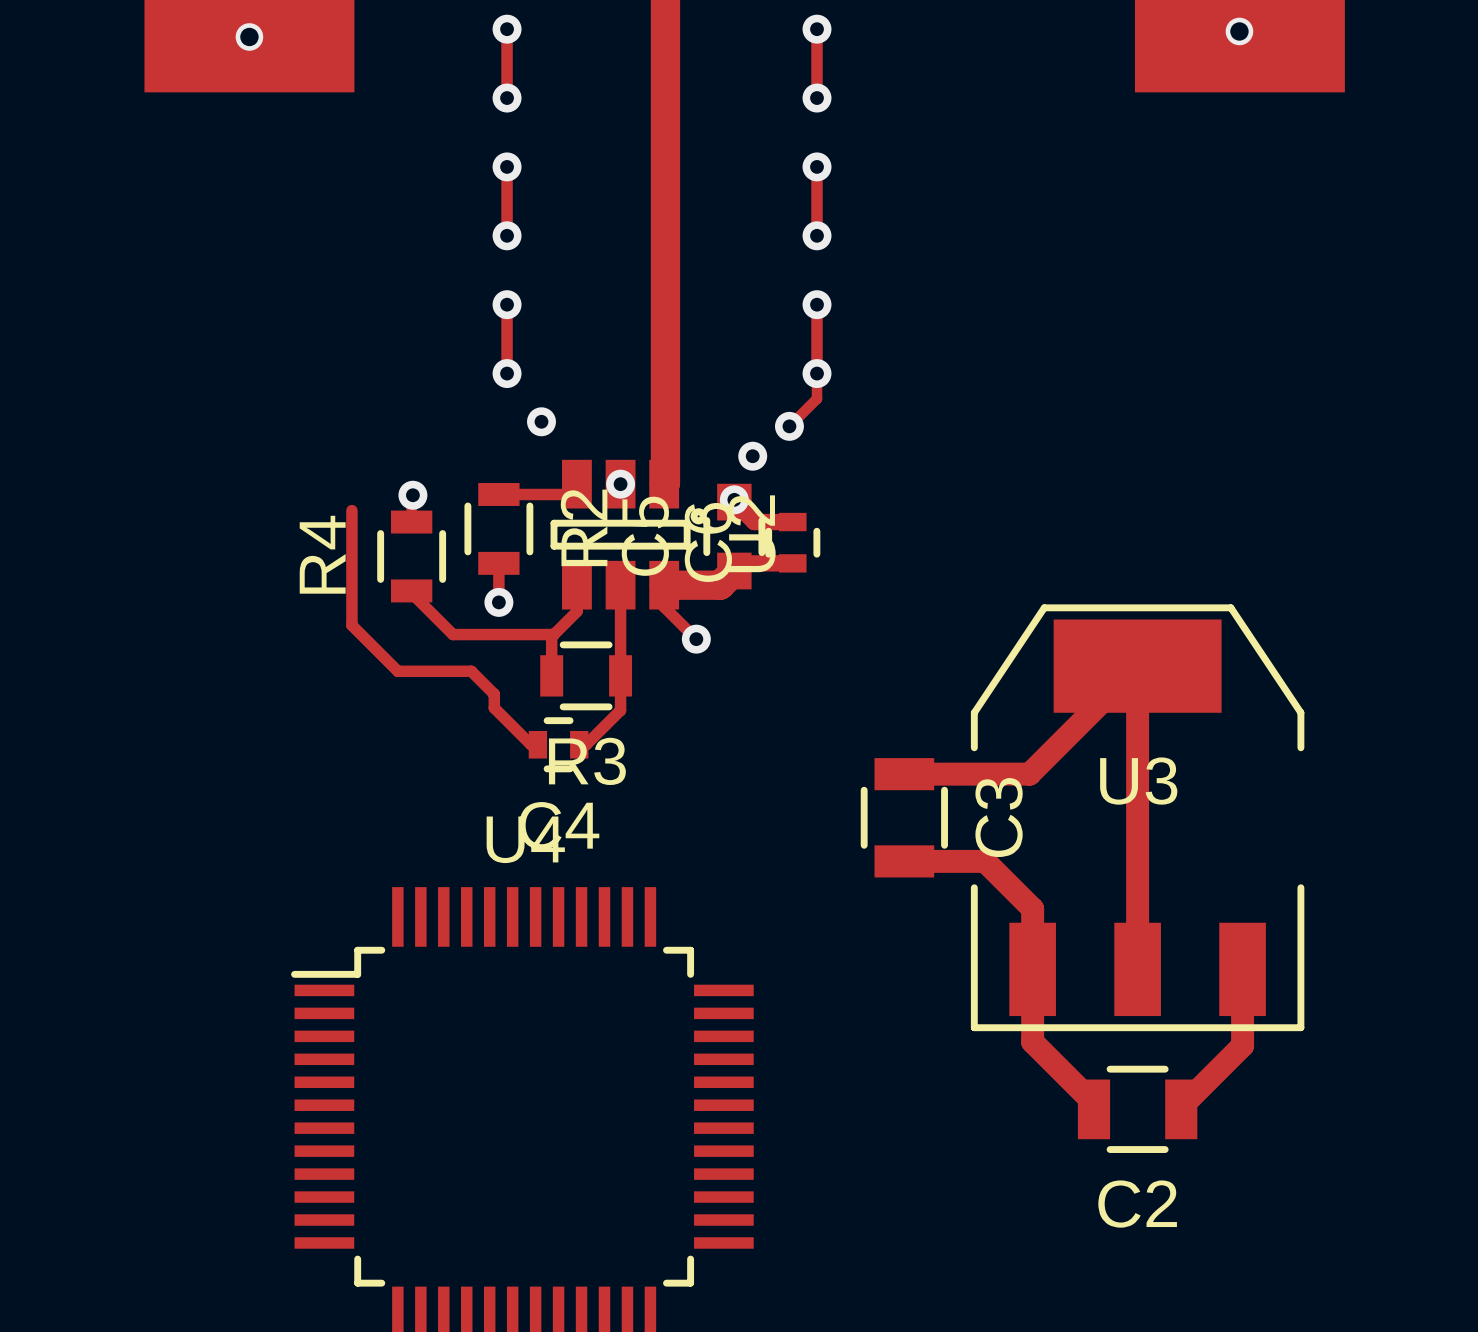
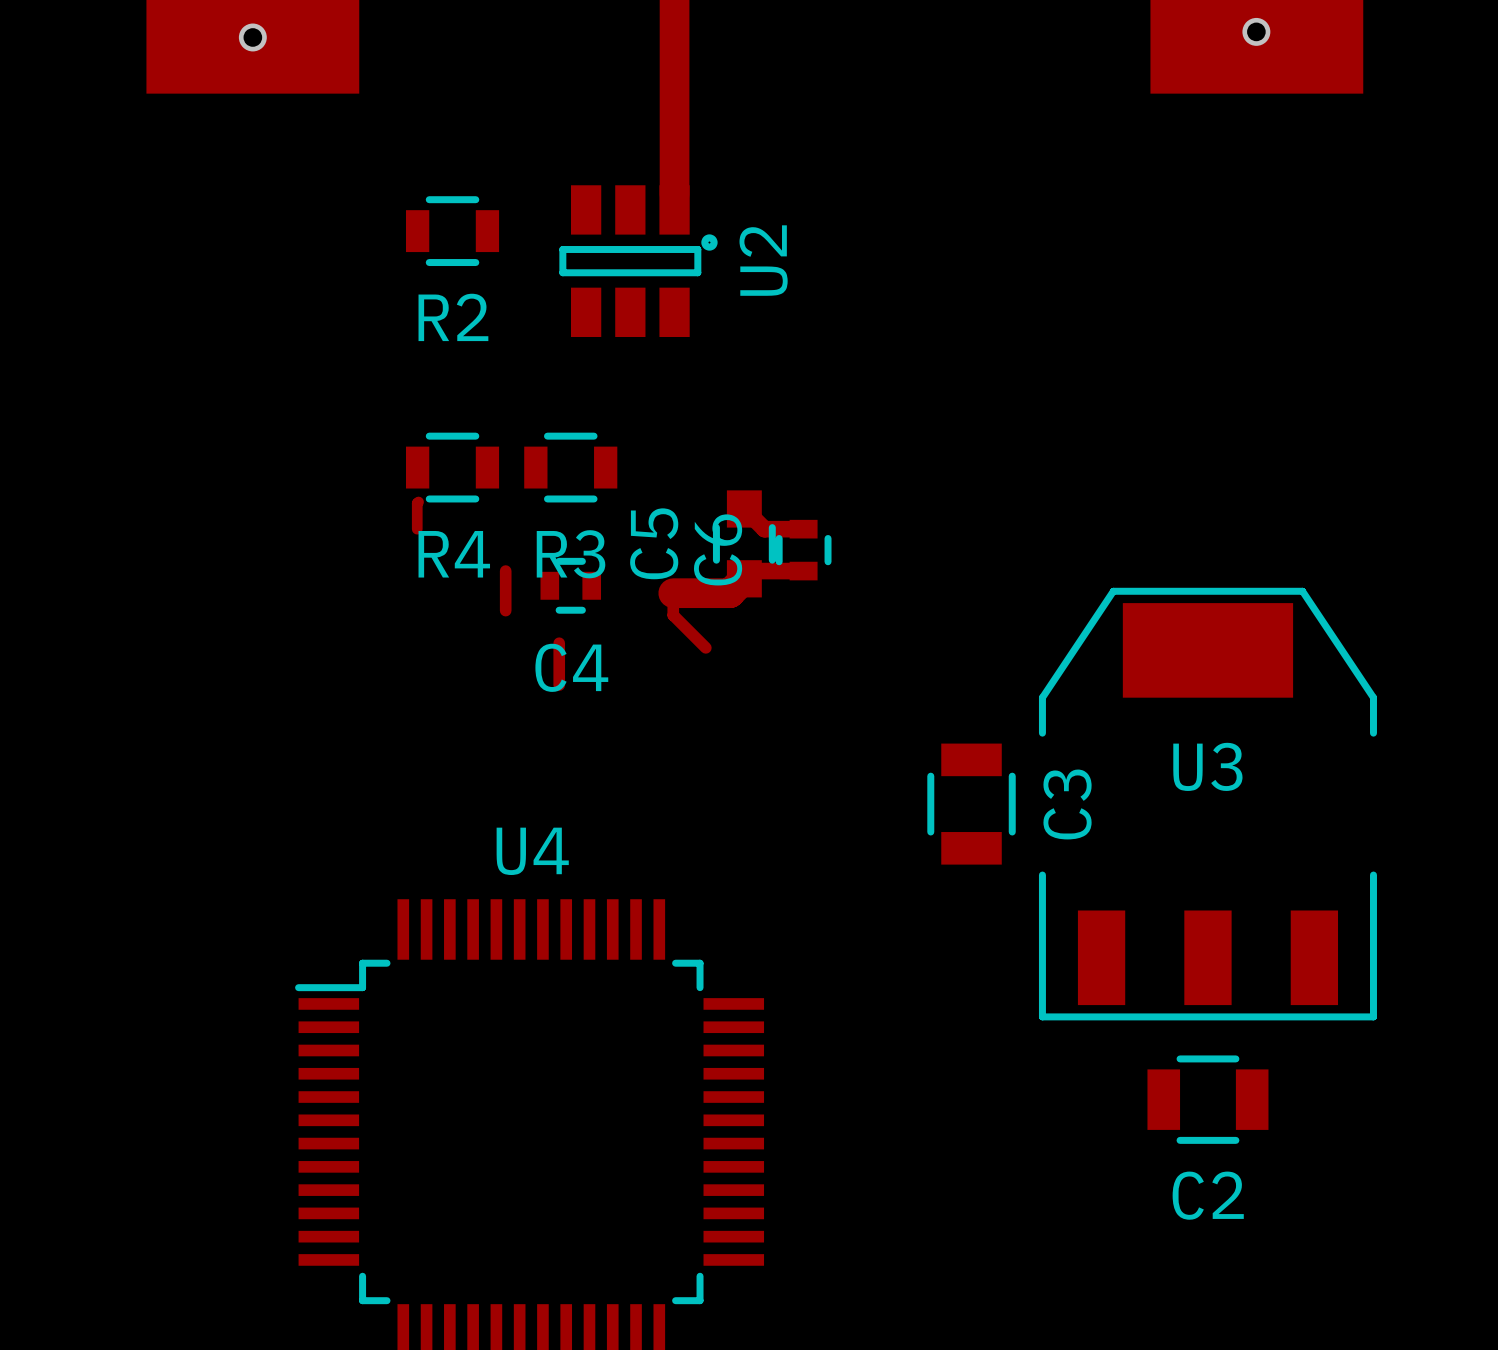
track: (507, 29) (507, 98) -> none
via: (507, 29) -> none
track: (817, 29) (817, 98) -> none
via: (817, 29) -> none
via: (507, 98) -> none
via: (817, 98) -> none
track: (507, 166) (507, 235) -> none
via: (507, 166) -> none
track: (817, 166) (817, 235) -> none
via: (817, 166) -> none
track: (665, 192) (665, 482) -> none
via: (507, 235) -> none
via: (817, 235) -> none
track: (507, 304) (507, 373) -> none
via: (507, 304) -> none
track: (817, 304) (817, 398) (789, 426) -> none
via: (817, 304) -> none
via: (507, 373) -> none
via: (817, 373) -> none
via: (541, 421) -> none
via: (789, 426) -> none
via: (752, 456) -> none
track: (576, 484) (566, 494) (498, 494) -> none
via: (620, 484) -> none
via: (412, 495) -> none
via: (734, 499) -> none
track: (351, 510) (351, 625) (397, 671) (471, 671) (494, 694) (494, 708) (531, 744) (537, 744) -> none
R2 rotation: 0° (498, 528) -> 90° clockwise (452, 231)
R2 position: (498, 528) -> (452, 231)
U2 position: (628, 534) -> (638, 261)
R4 name position: R4 (322, 554) -> R4 (454, 554)
R4 rotation: 0° (411, 556) -> 90° clockwise (452, 467)
R4 position: (411, 556) -> (452, 467)
track: (576, 585) (576, 611) (553, 634) (452, 634) (411, 593) (411, 590) -> none
track: (620, 585) (620, 710) (586, 744) (579, 744) -> none
via: (498, 602) -> none
via: (696, 639) -> none
R3 position: (586, 675) -> (570, 467)
C4 position: (558, 744) -> (570, 585)
track: (904, 774) (1029, 774) (1137, 666) (1137, 969) -> none
C3 position: (904, 817) -> (971, 804)
U3 position: (1137, 817) -> (1207, 804)
track: (904, 861) (985, 861) (1032, 908) (1032, 1042) (1094, 1103) (1094, 1109) -> none
track: (1242, 969) (1242, 1045) (1181, 1107) (1181, 1109) -> none
C2 position: (1137, 1109) -> (1207, 1099)

